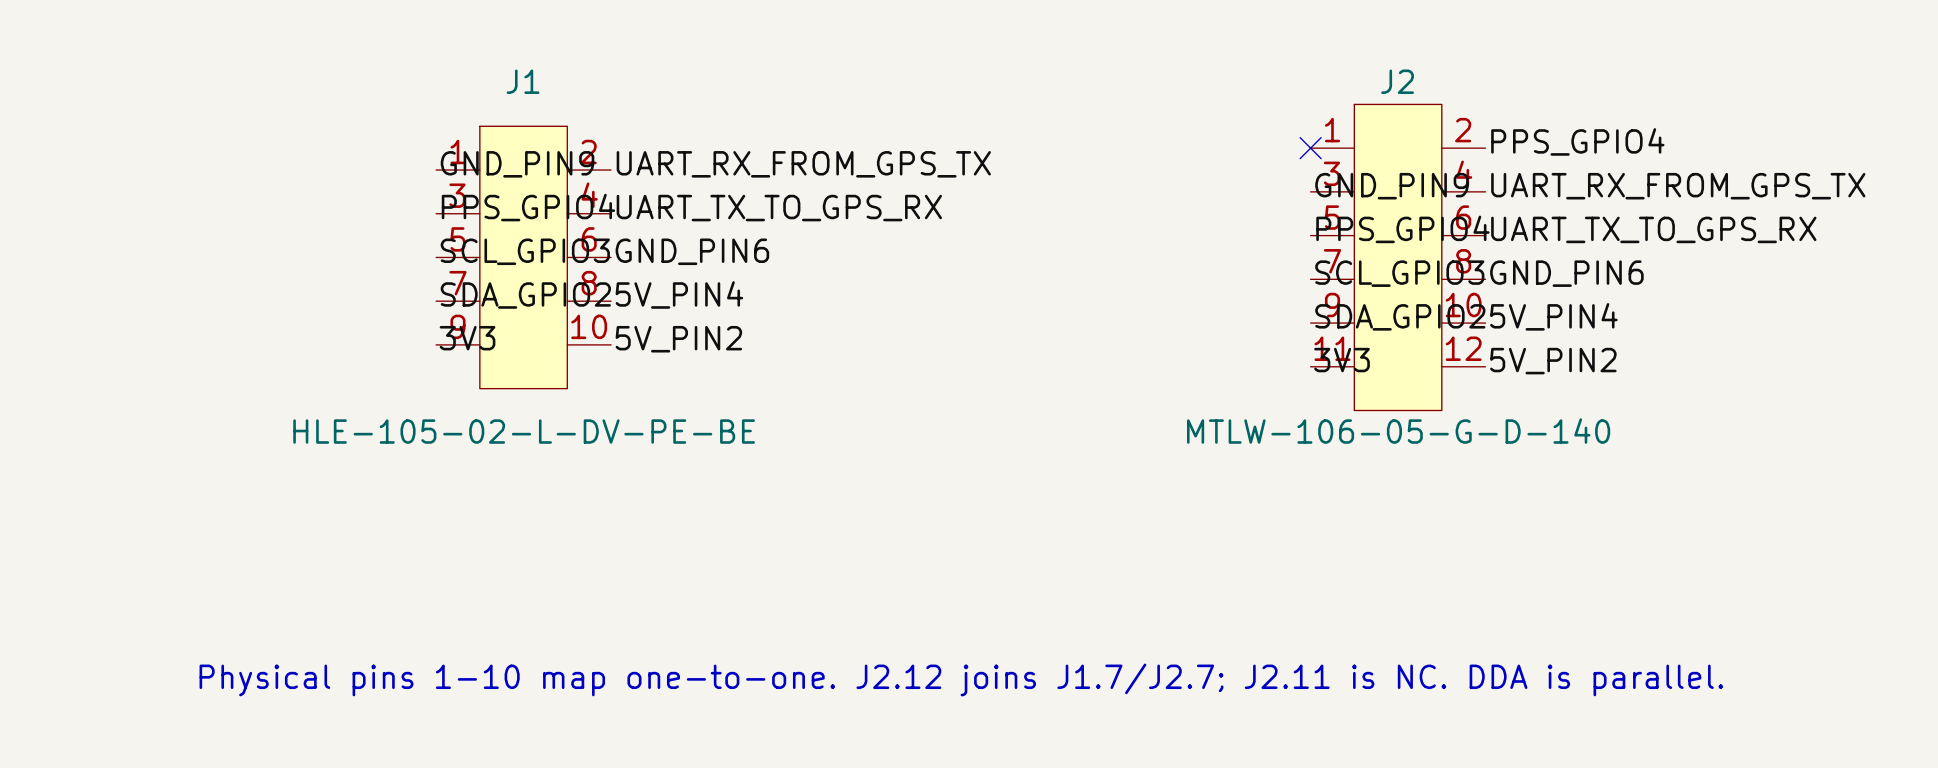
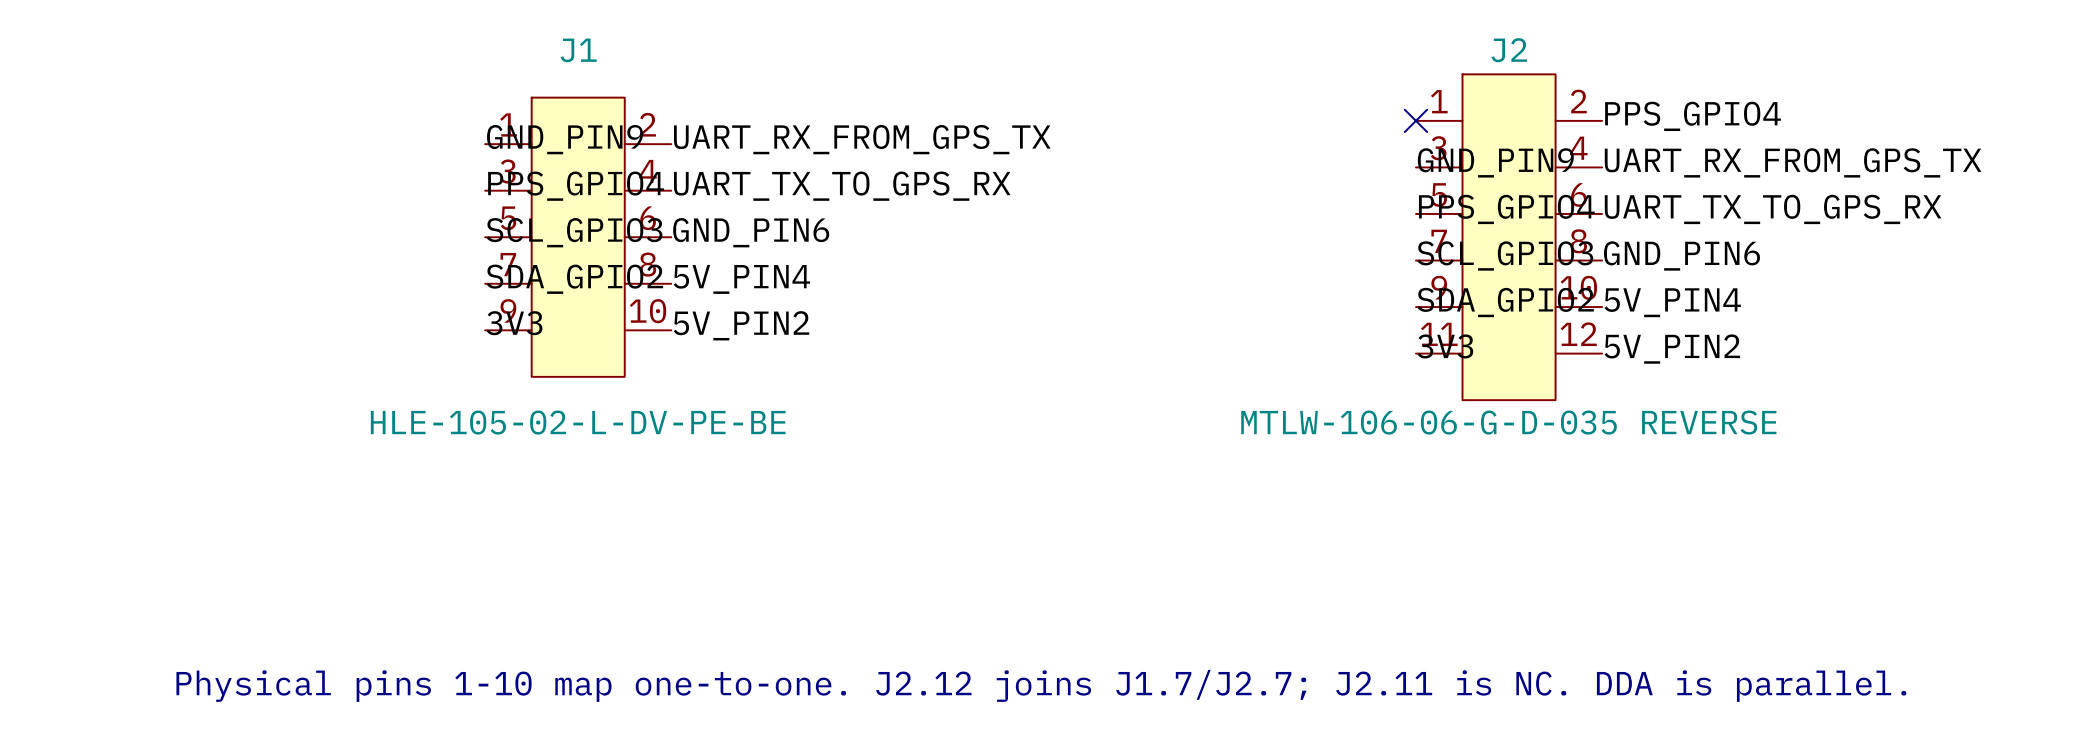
J2 value: MTLW-106-05-G-D-140 (1398, 431) -> MTLW-106-06-G-D-035 REVERSE (1508, 422)

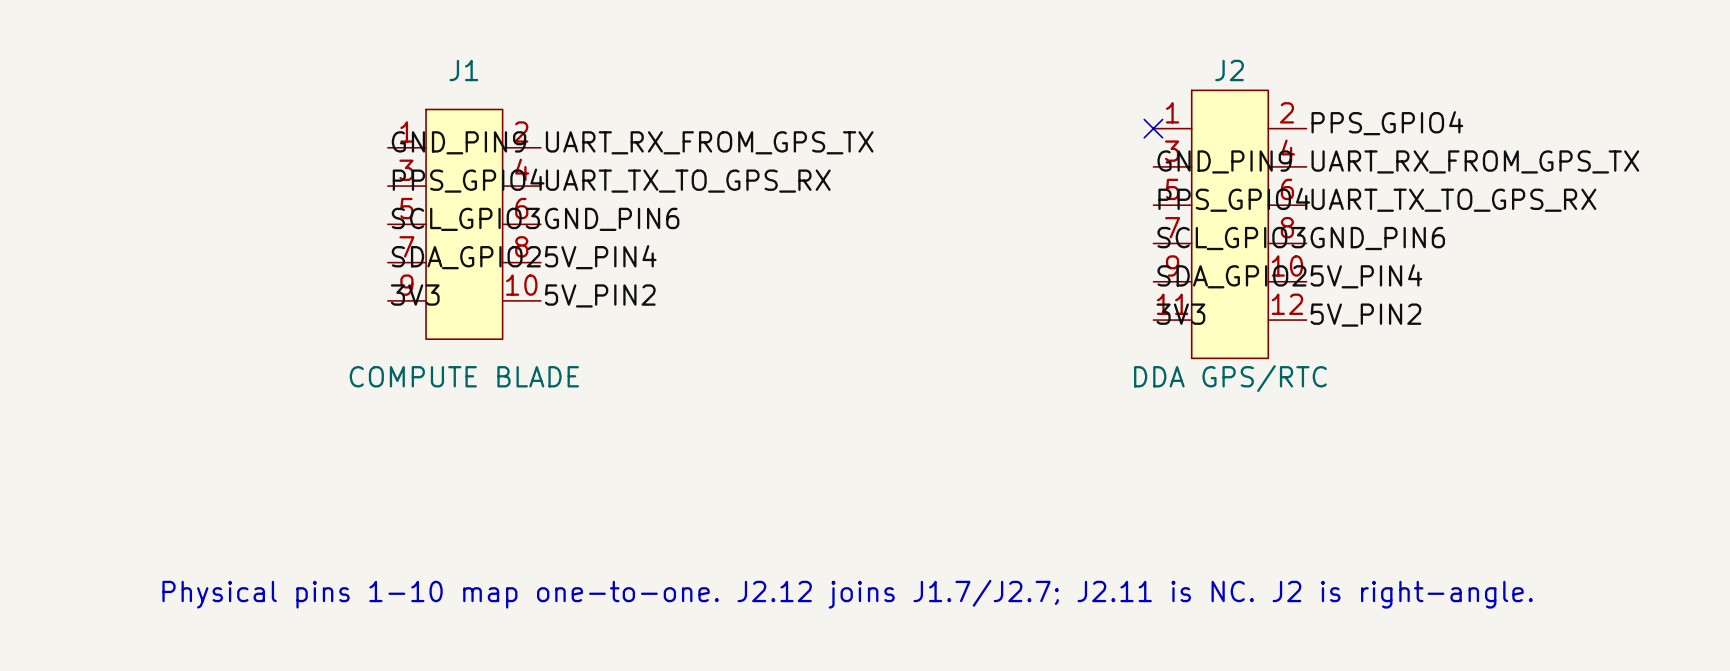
J1 value: HLE-105-02-L-DV-PE-BE (578, 422) -> COMPUTE BLADE (464, 376)
J2 value: MTLW-106-06-G-D-035 REVERSE (1508, 422) -> DDA GPS/RTC (1230, 378)
text: Physical pins 1-10 map one-to-one. J2.12 joins J1.7/J2.7; J2.11 is NC. DDA is parallel. (1041, 685) -> Physical pins 1-10 map one-to-one. J2.12 joins J1.7/J2.7; J2.11 is NC. J2 is right-angle. (847, 594)

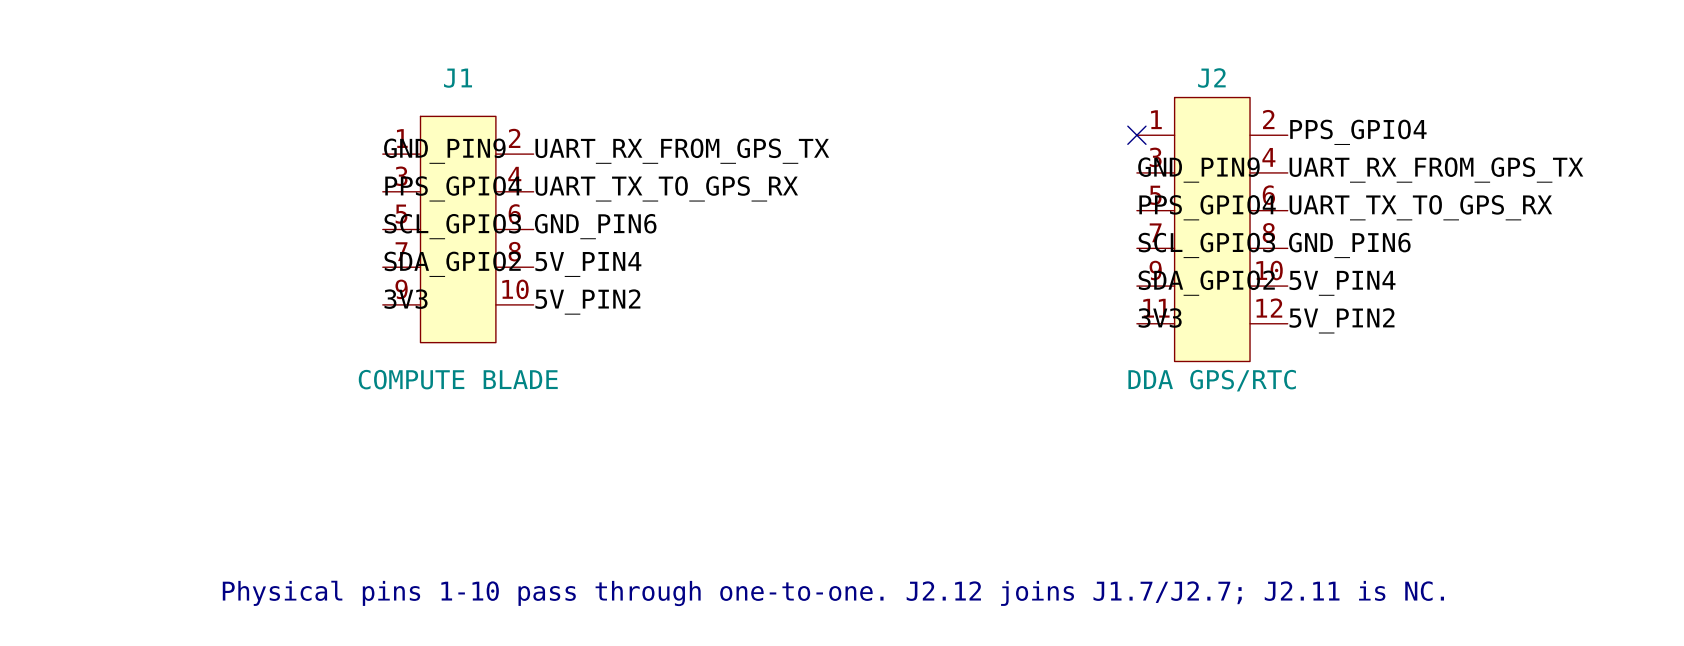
text: Physical pins 1-10 map one-to-one. J2.12 joins J1.7/J2.7; J2.11 is NC. J2 is right-angle. (847, 594) -> Physical pins 1-10 pass through one-to-one. J2.12 joins J1.7/J2.7; J2.11 is NC. (833, 593)

